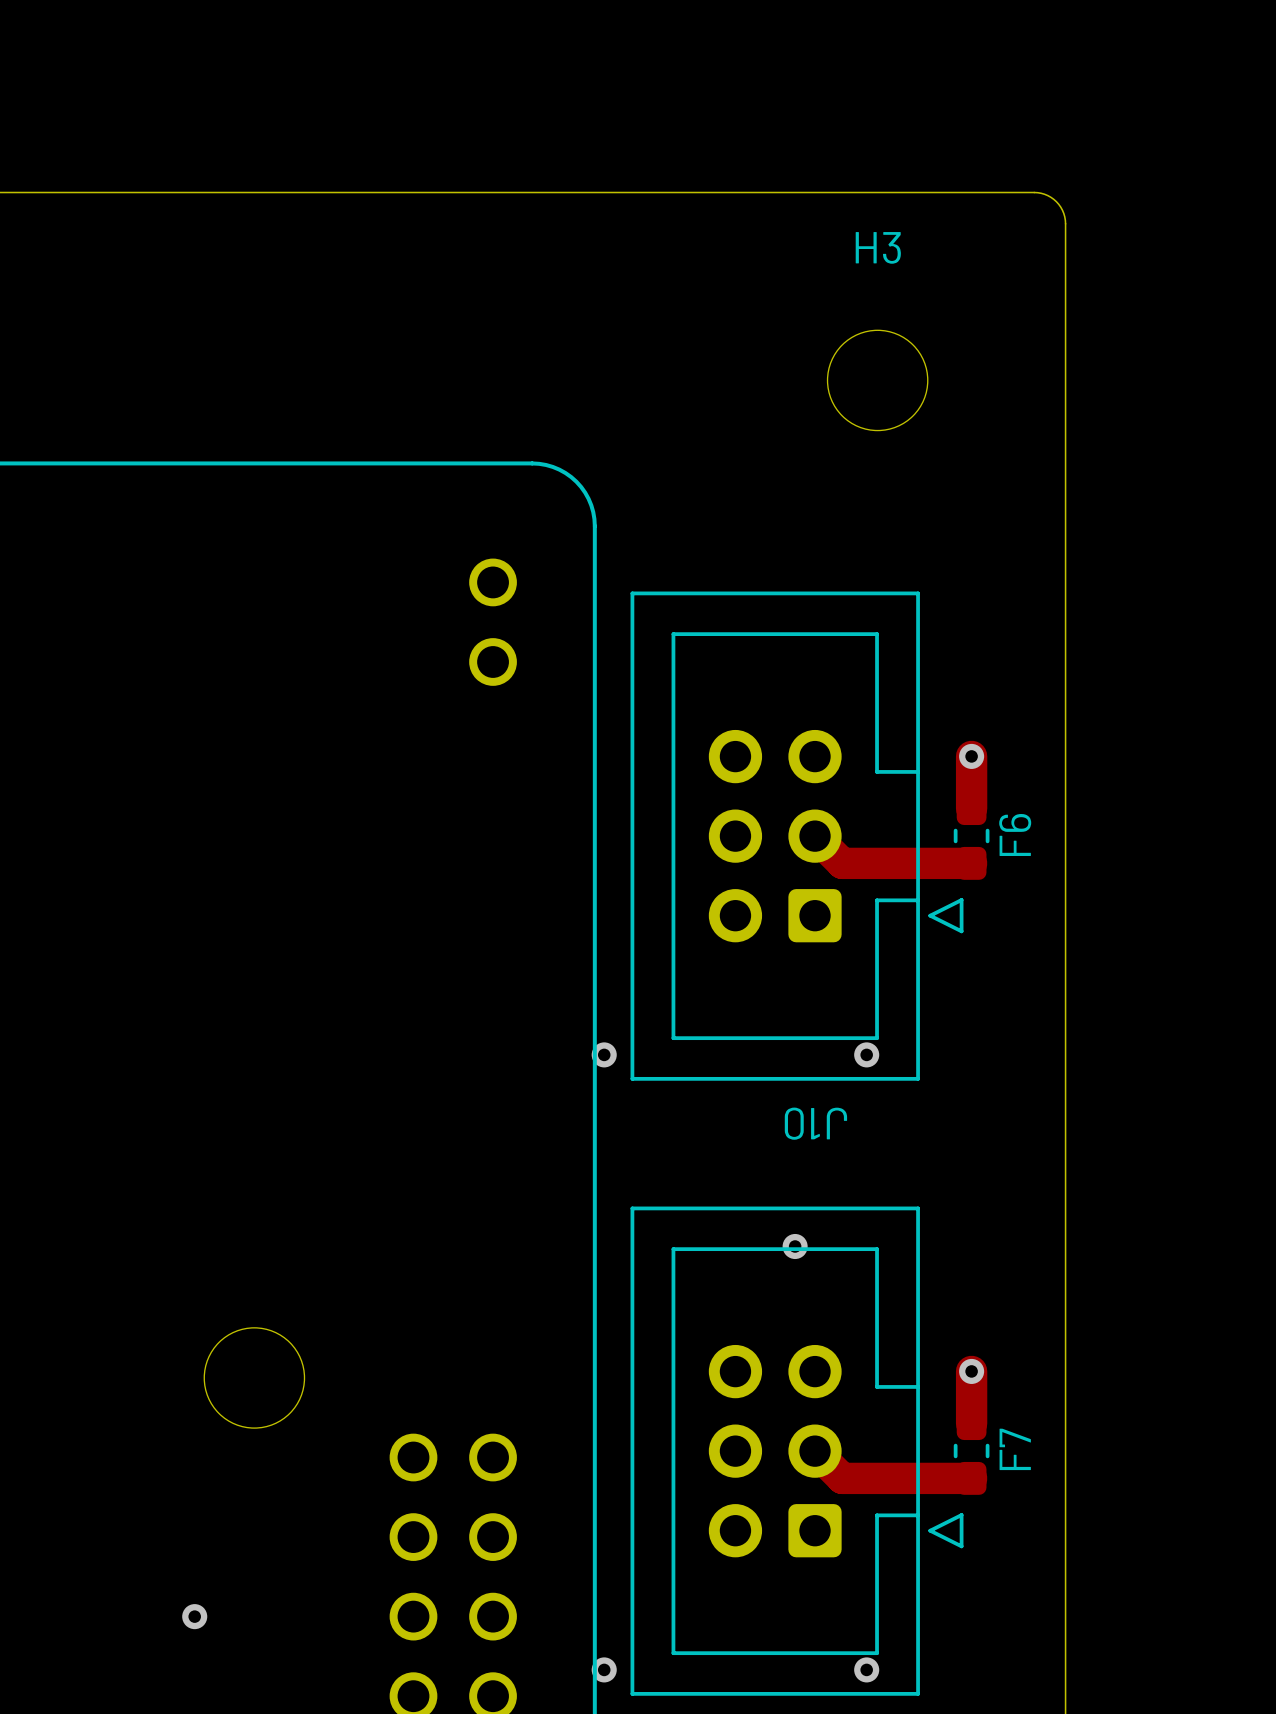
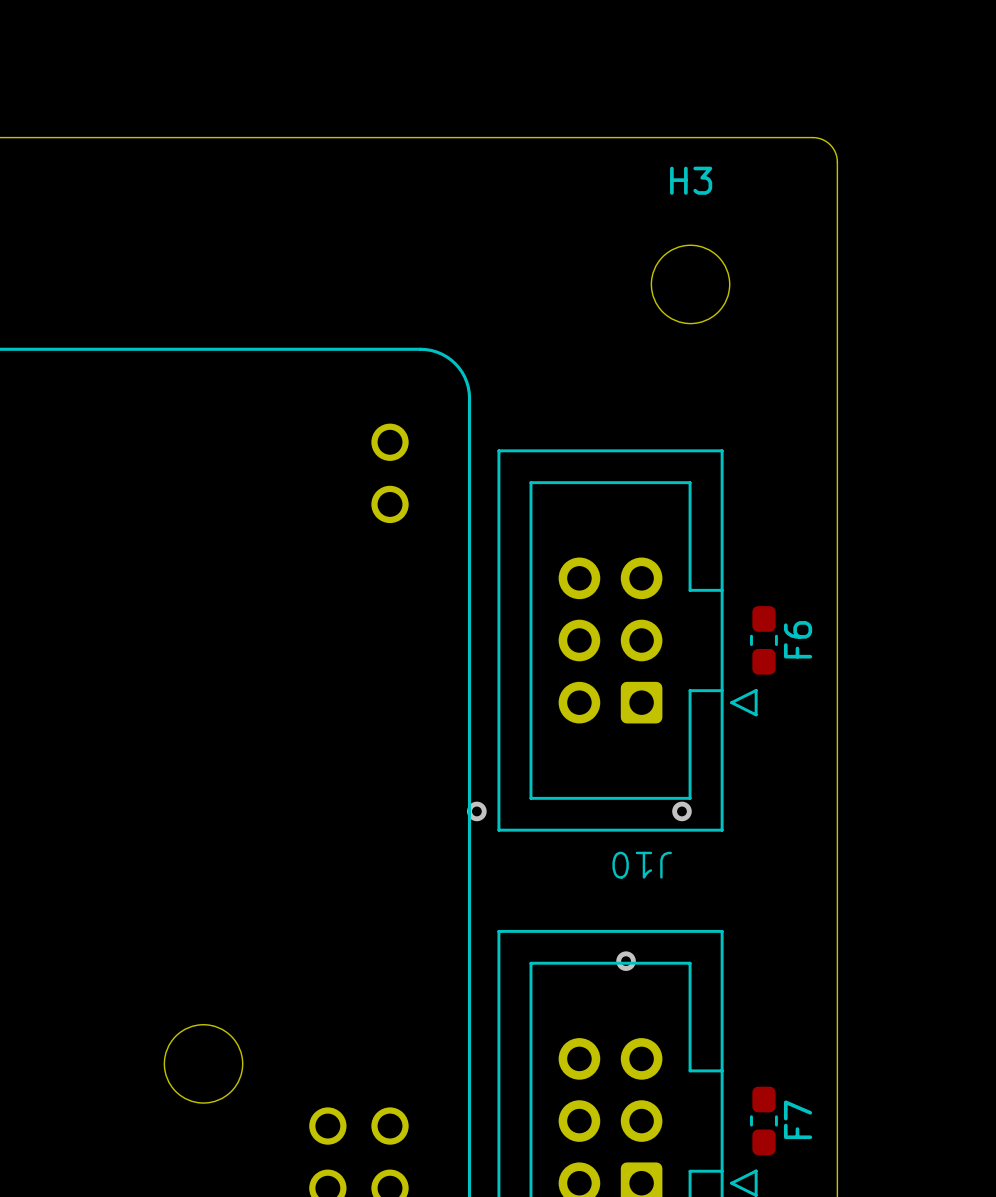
track: (971, 756) (971, 808) -> none
via: (971, 756) -> none
track: (815, 836) (842, 863) (971, 863) -> none
track: (971, 1371) (971, 1423) -> none
via: (971, 1371) -> none
track: (815, 1451) (842, 1478) (971, 1478) -> none

